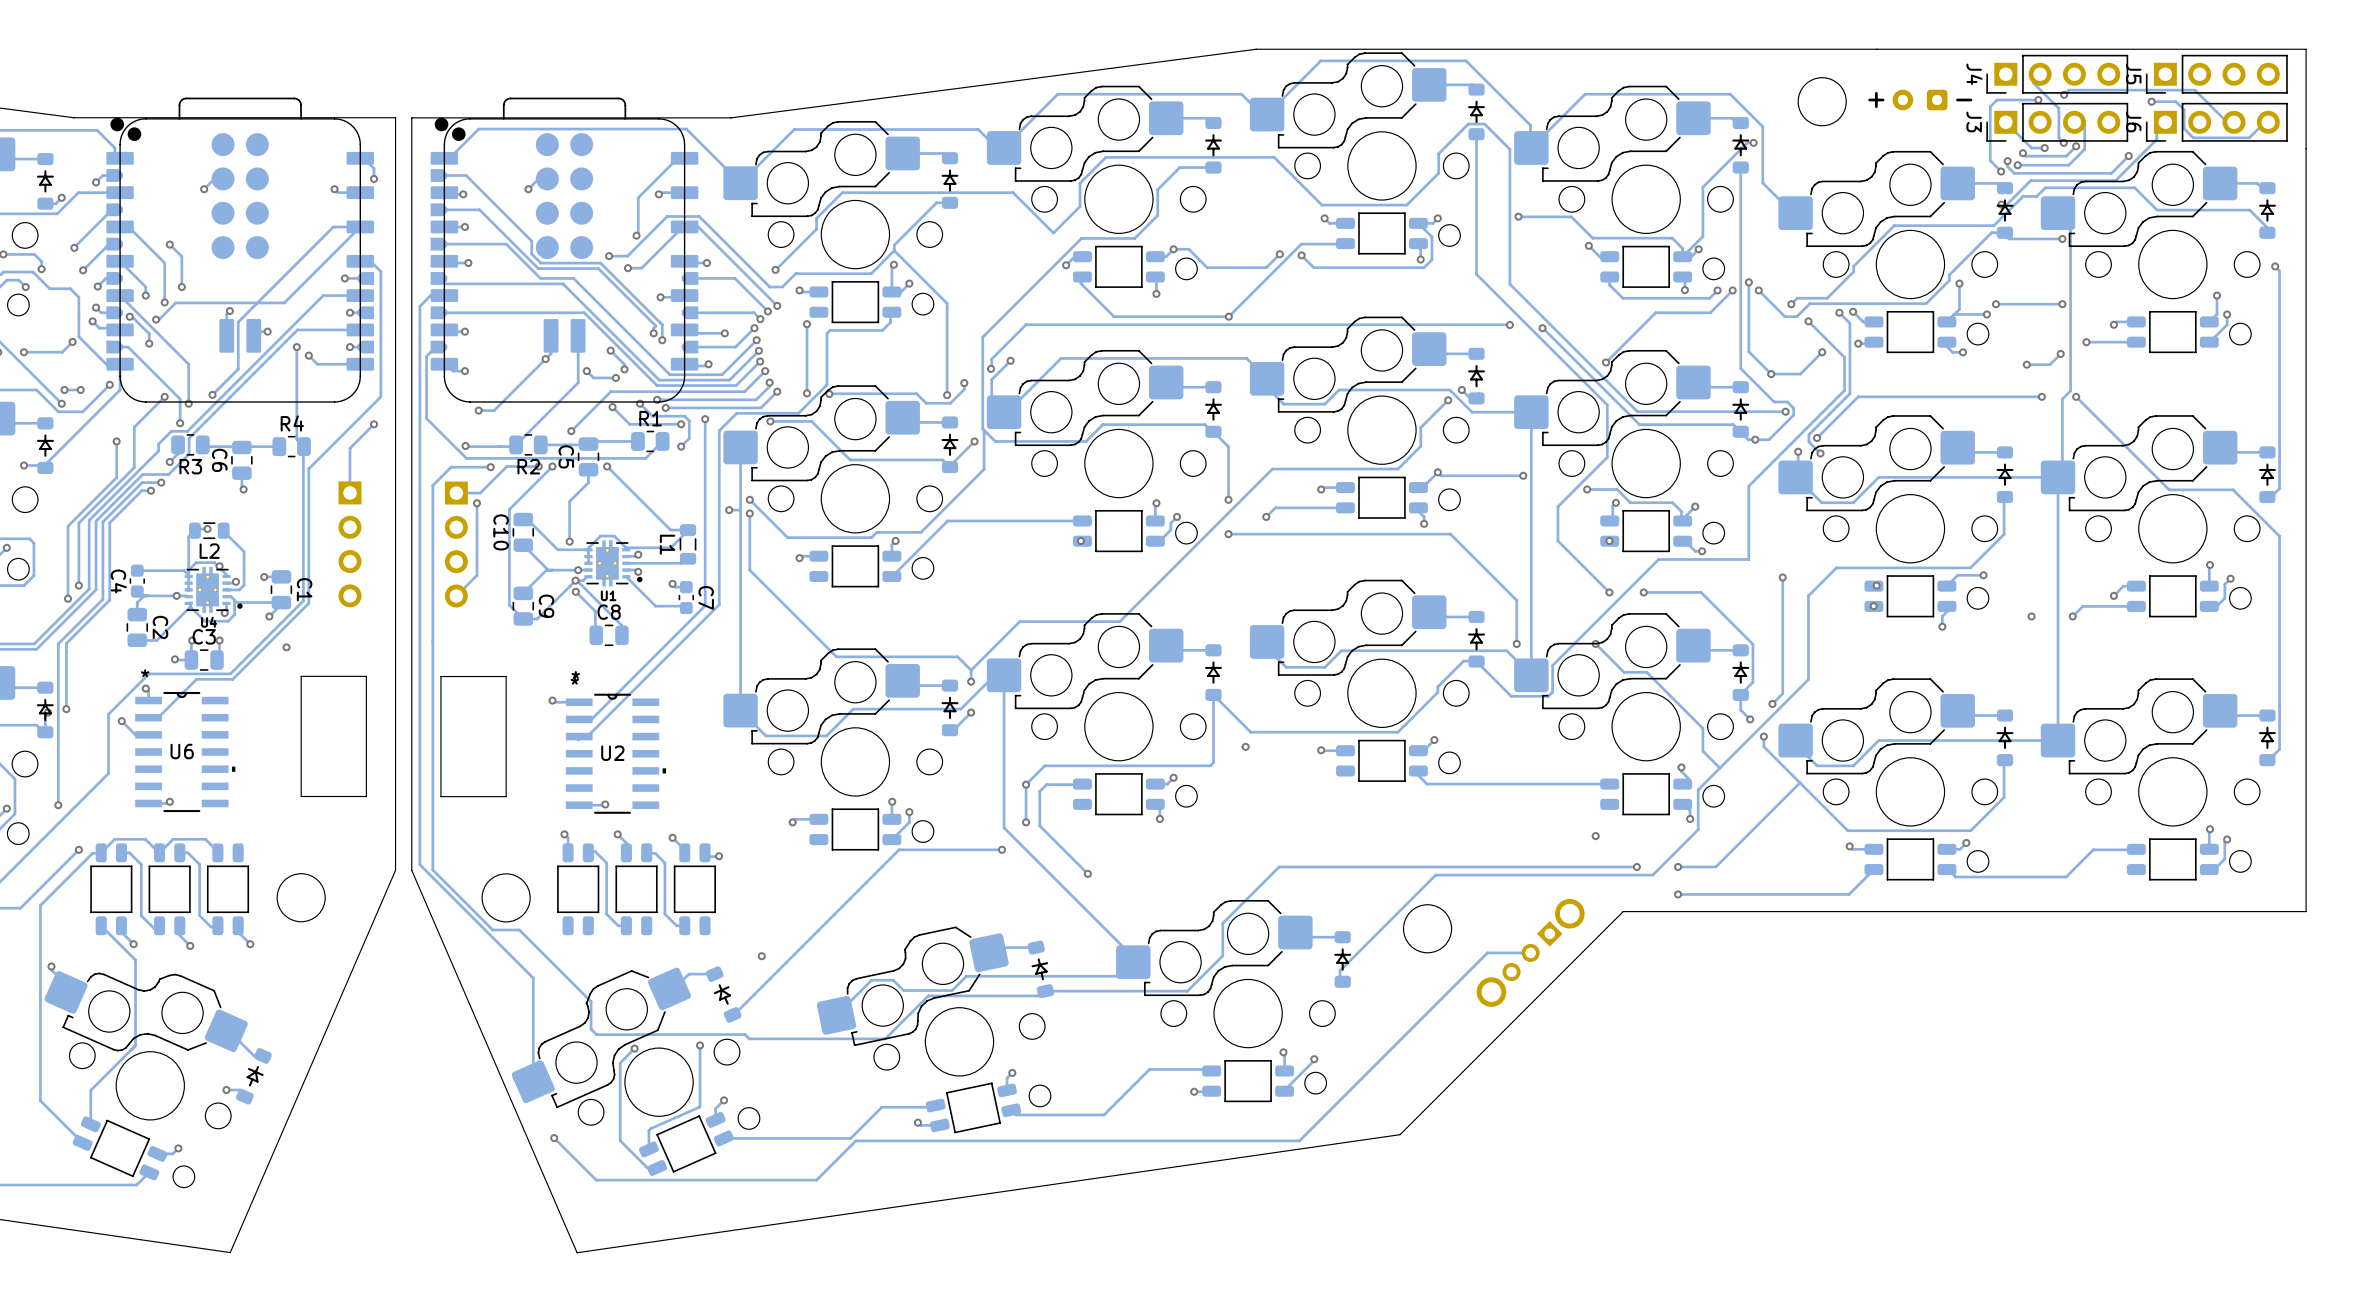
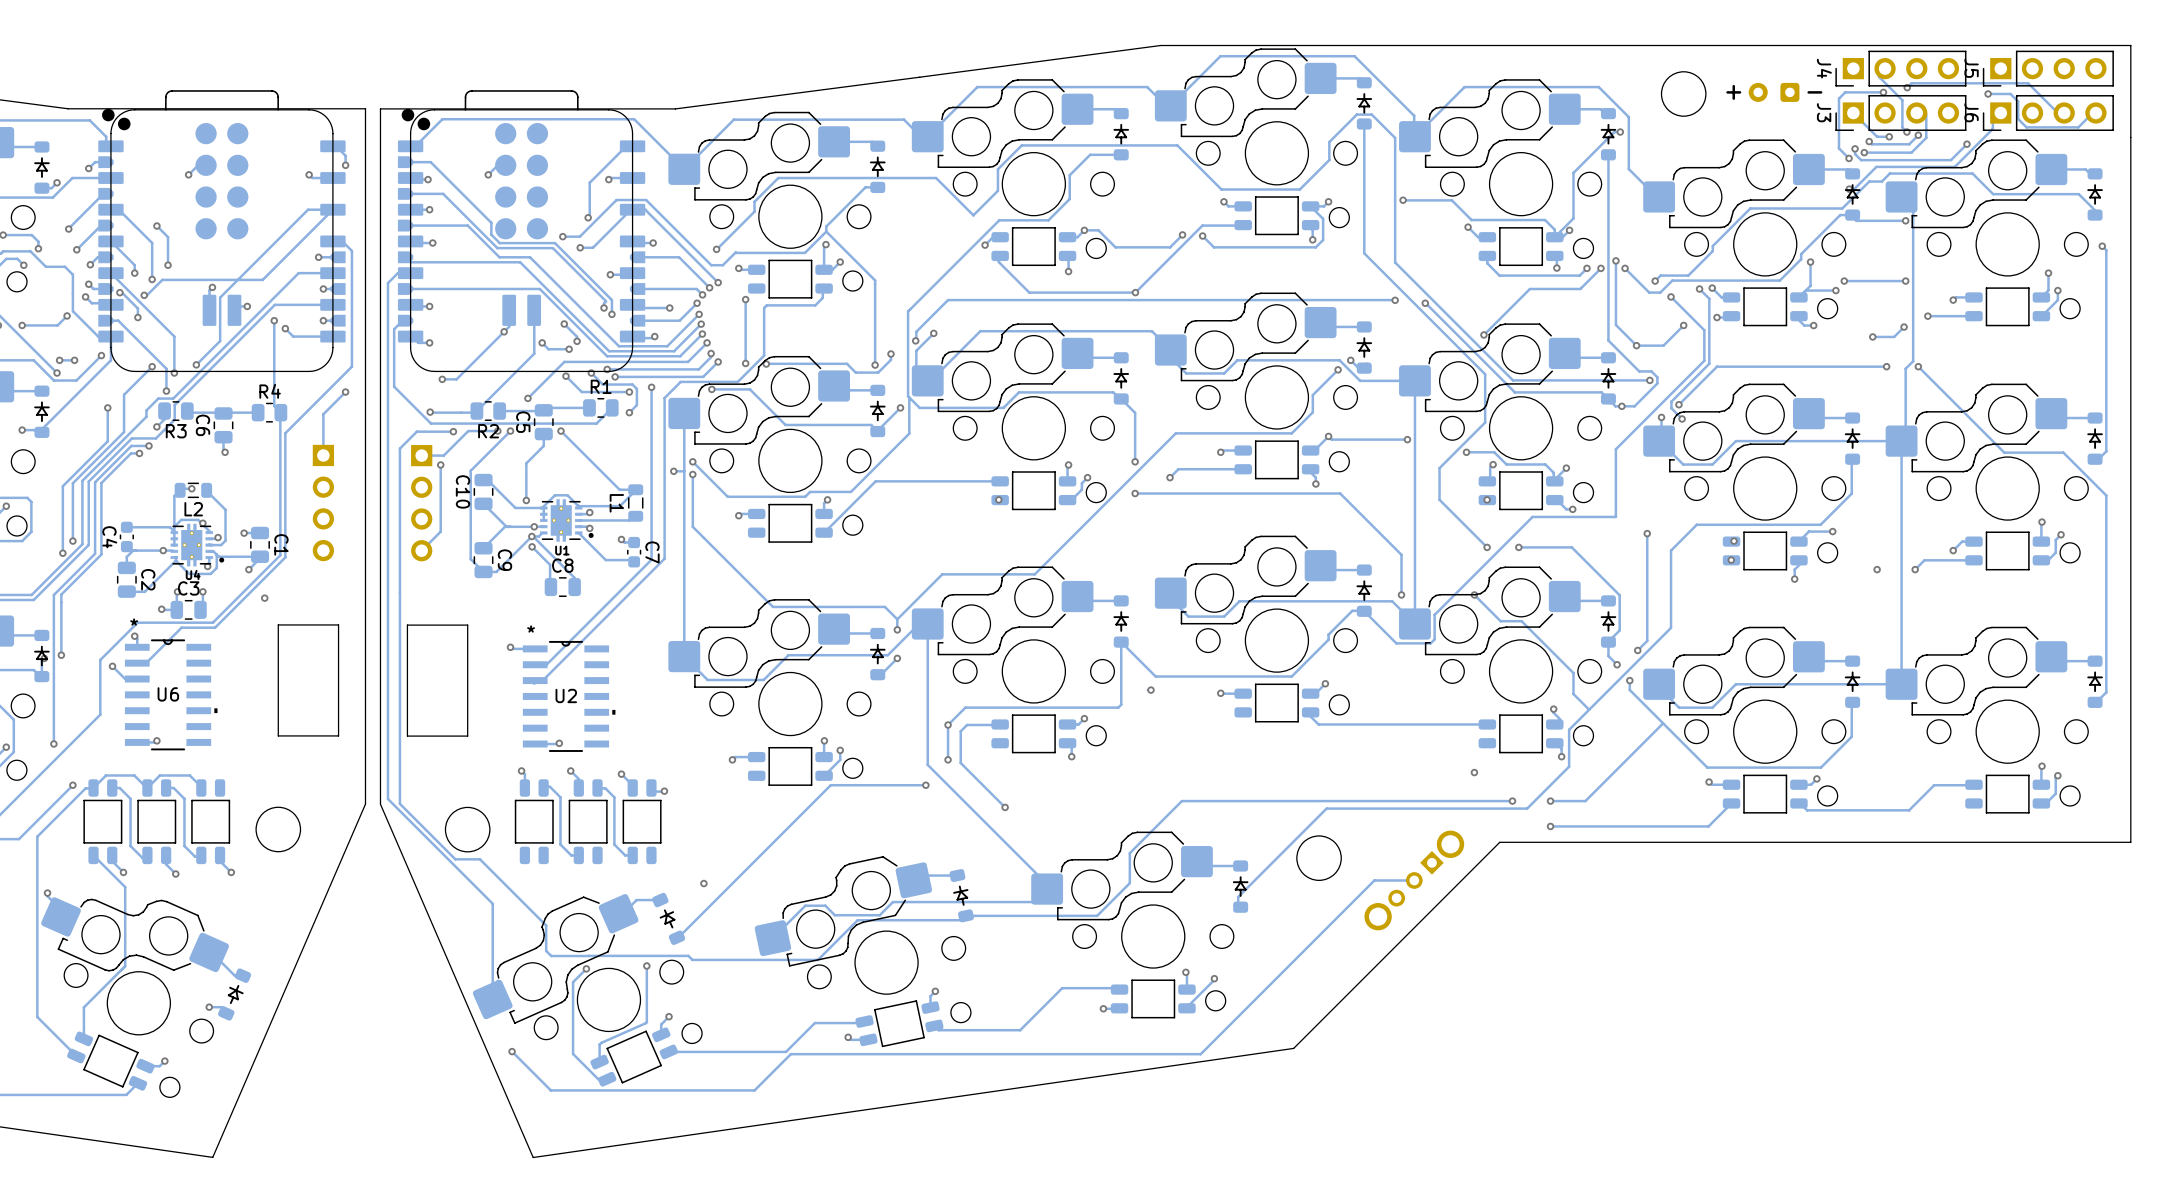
U2 text: * (575, 674) -> none

